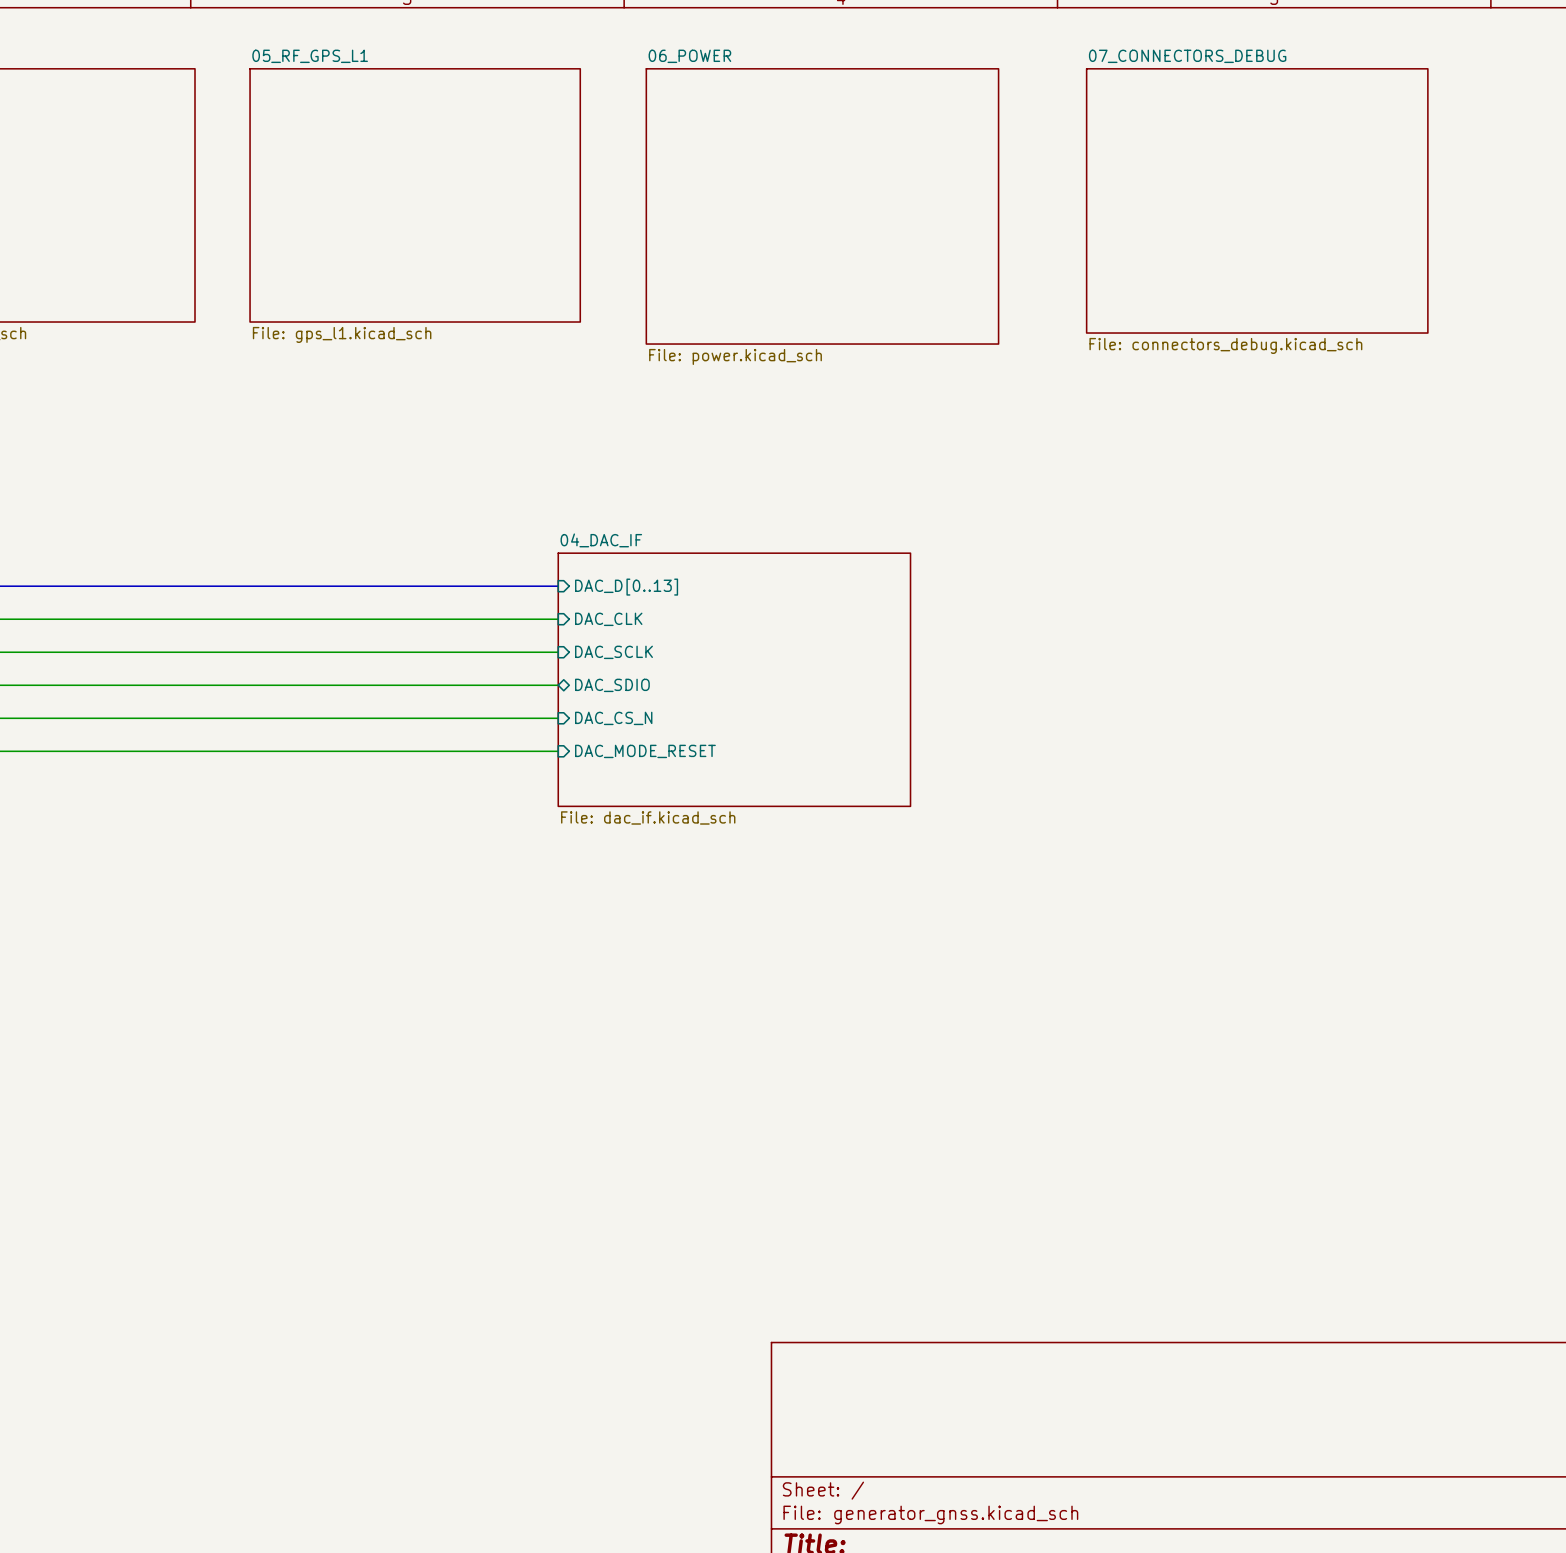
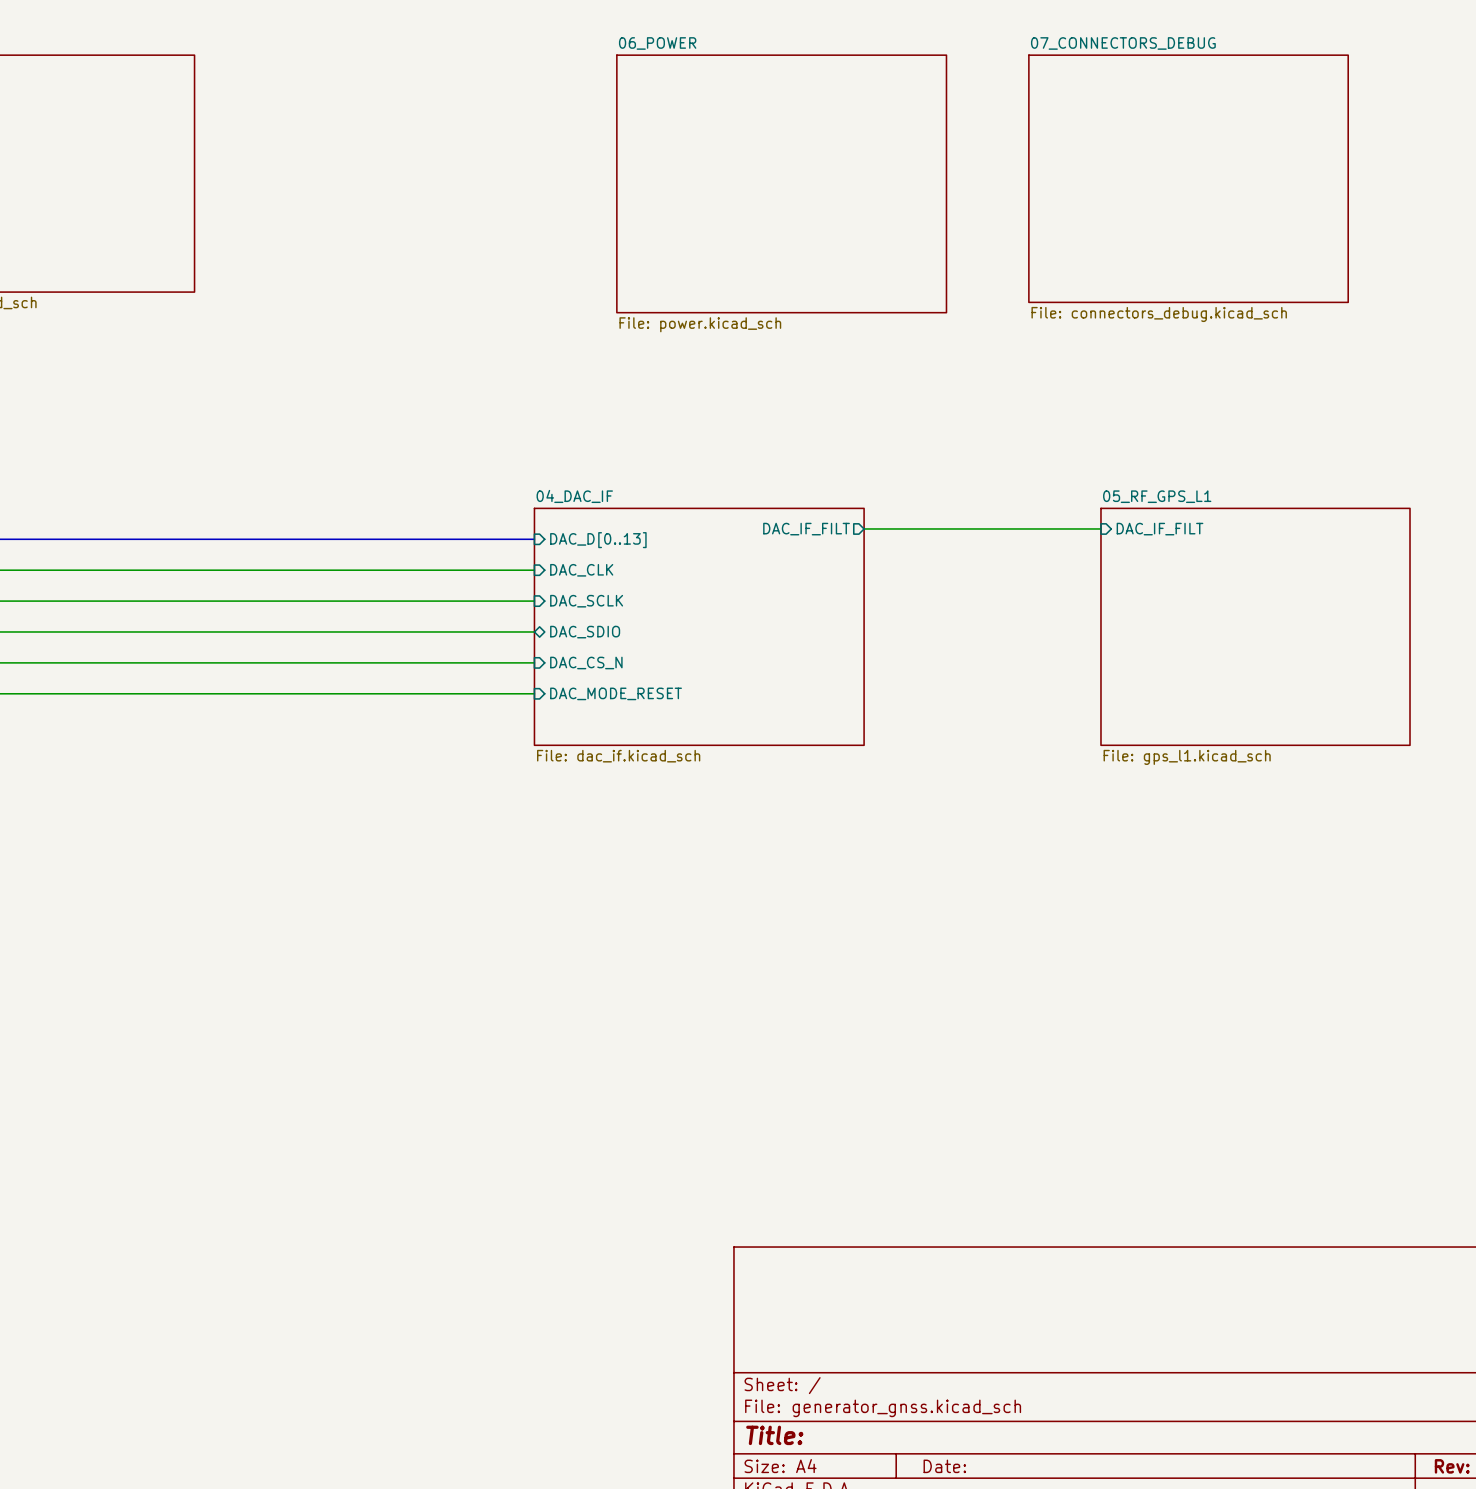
sheet 05_RF_GPS_L1 position: (415, 195) -> (1255, 626)
sheet pin: none -> DAC_IF_FILT (806, 529)
wire: none -> (864, 528) (1100, 528)
sheet pin: none -> DAC_IF_FILT (1160, 529)

